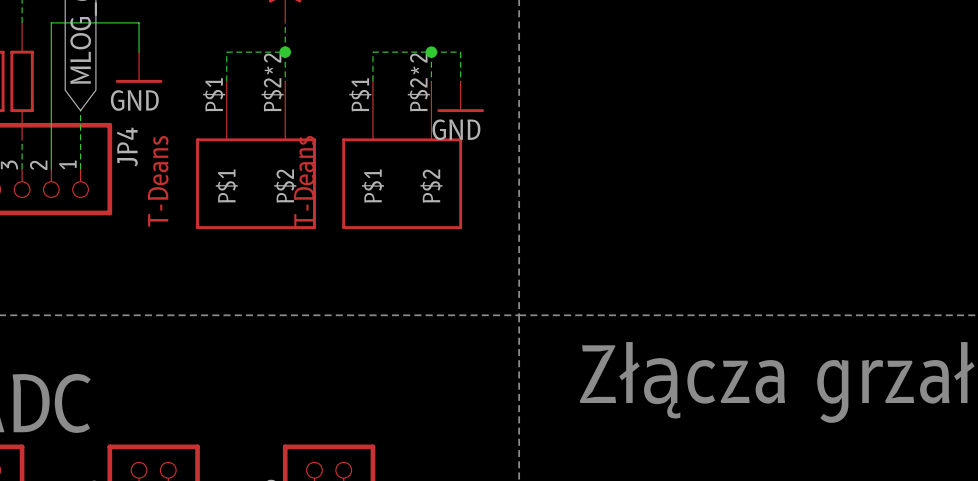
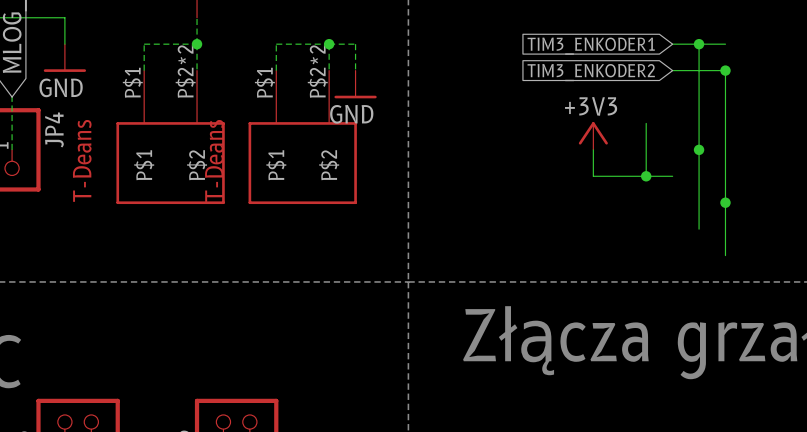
wire: none -> (672, 44) (725, 44)
wire: none -> (699, 44) (699, 229)
junction: none -> (699, 44)
global label: none -> TIM3_ENKODER1 (591, 46)
wire: none -> (672, 70) (725, 70) (725, 255)
junction: none -> (725, 70)
global label: none -> TIM3_ENKODER2 (591, 72)
wire: none -> (646, 123) (646, 176)
power symbol: none -> +3V3 (593, 135)
wire: none -> (593, 149) (593, 176) (672, 176)
junction: none -> (699, 149)
junction: none -> (646, 176)
junction: none -> (725, 202)

